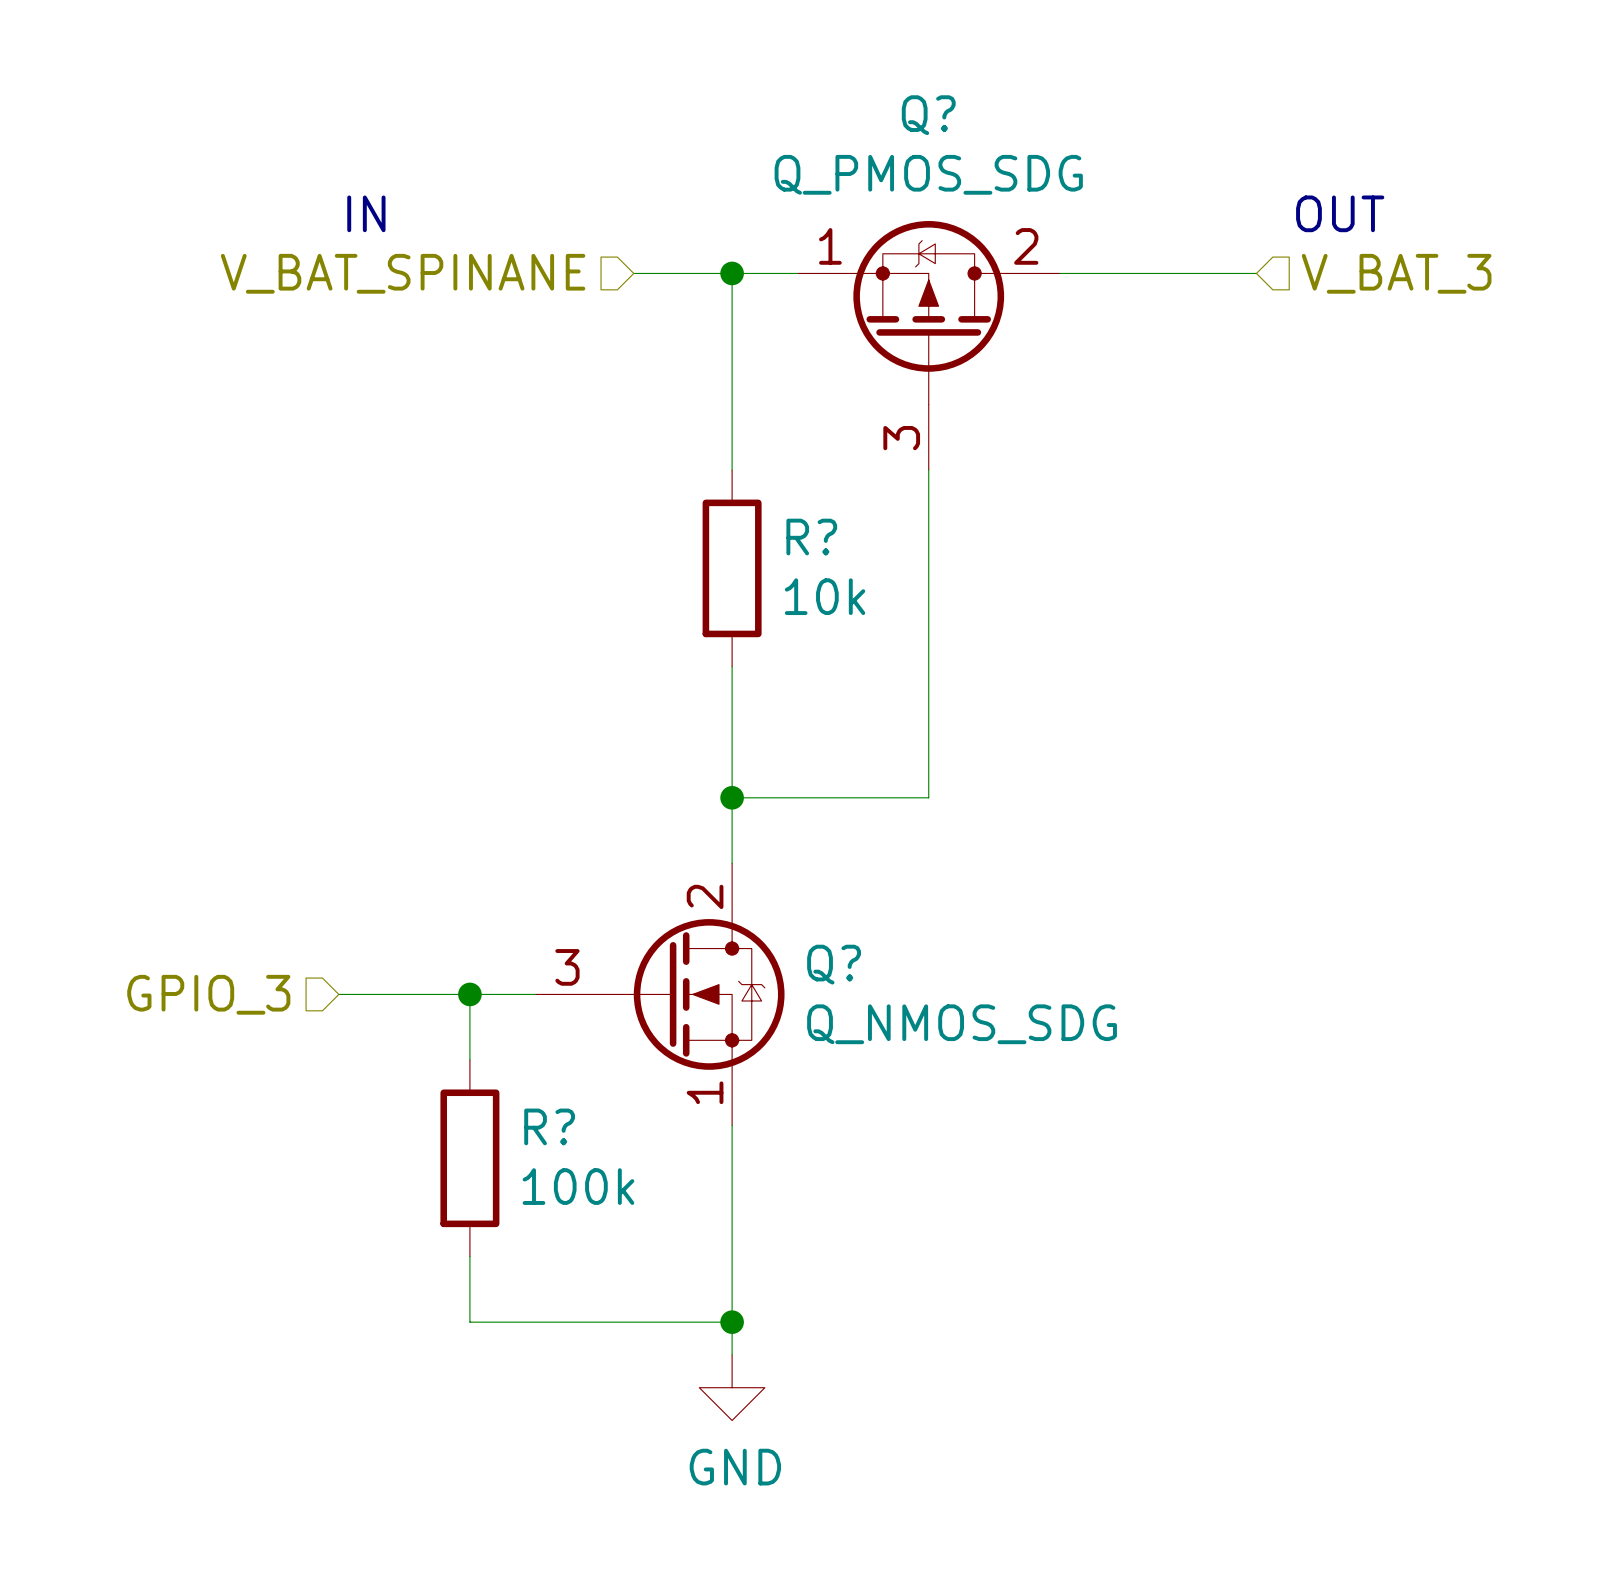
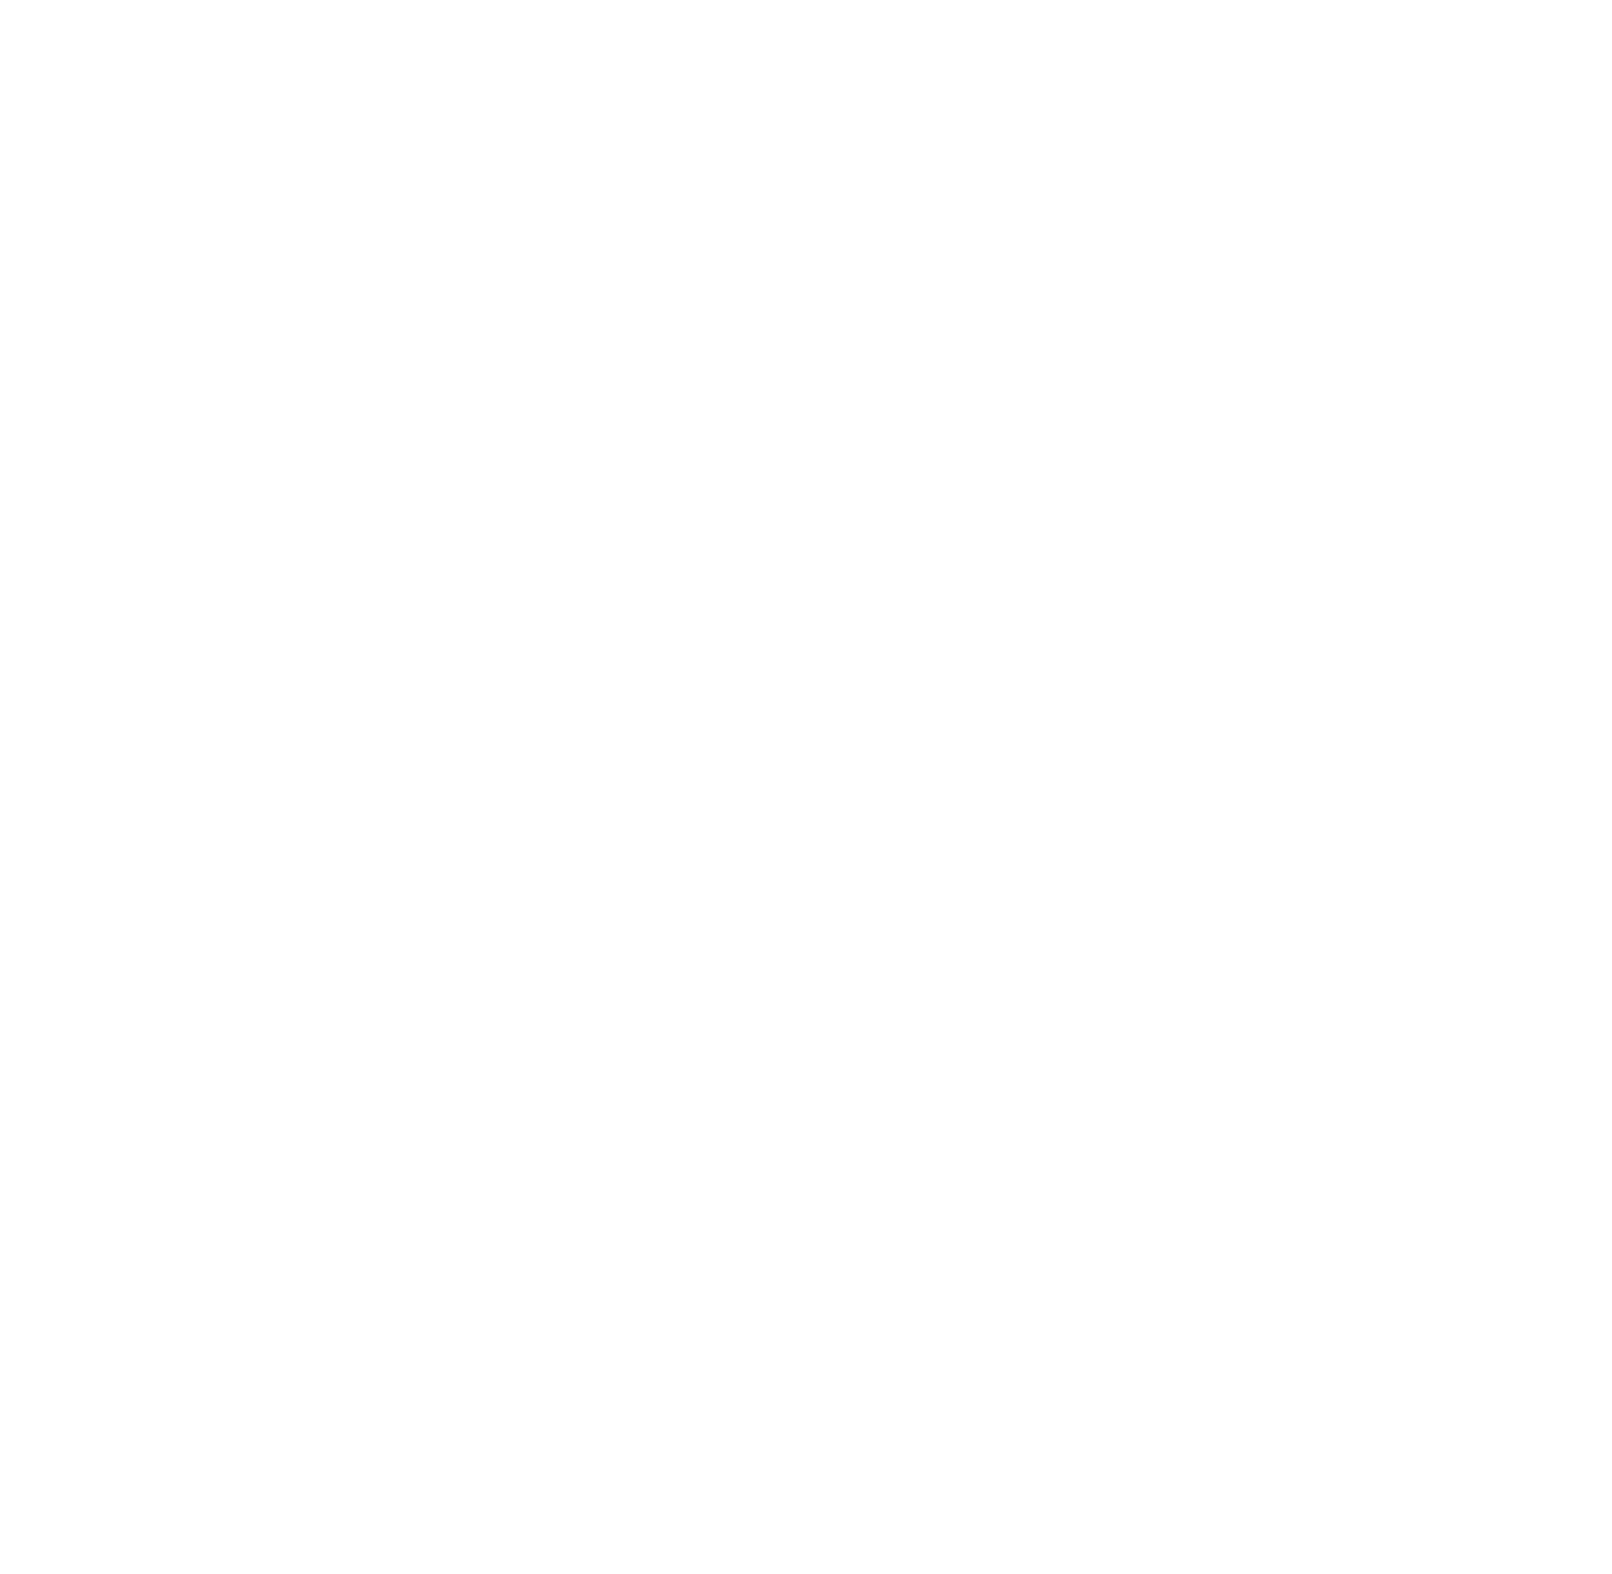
text: IN (366, 213) -> none
text: OUT (1340, 213) -> none
hierarchical label: V_BAT_SPINANE (403, 273) -> none
wire: (633, 273) (797, 273) -> none
wire: (732, 273) (732, 470) -> none
junction: (732, 273) -> none
wire: (1059, 273) (1256, 273) -> none
hierarchical label: V_BAT_3 (1396, 273) -> none
Q?: Q_PMOS_SDG (928, 345) -> none
wire: (928, 470) (928, 797) (732, 797) -> none
R?: 10k (732, 568) -> none
wire: (732, 666) (732, 863) -> none
junction: (732, 797) -> none
hierarchical label: GPIO_3 (208, 994) -> none
wire: (338, 994) (535, 994) -> none
wire: (469, 994) (469, 1059) -> none
junction: (469, 994) -> none
Q?: Q_NMOS_SDG (660, 994) -> none
wire: (732, 1125) (732, 1354) -> none
R?: 100k (469, 1158) -> none
wire: (469, 1256) (469, 1322) (732, 1322) -> none
junction: (732, 1322) -> none
power symbol: GND (732, 1387) -> none

